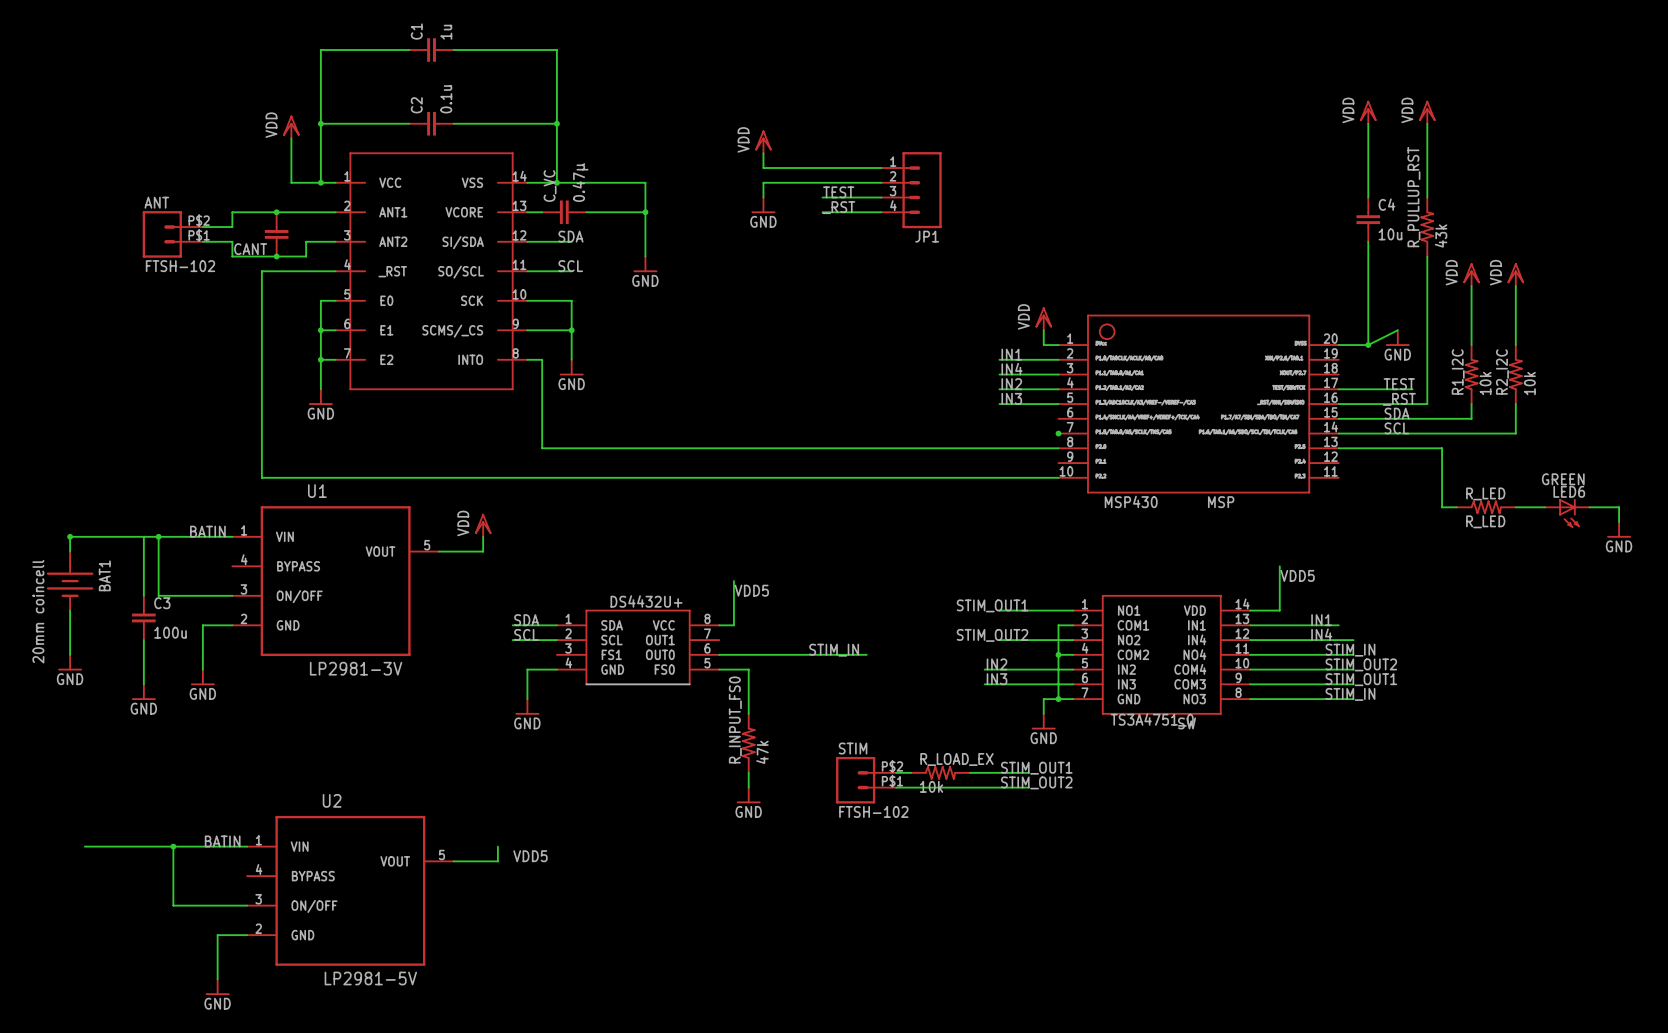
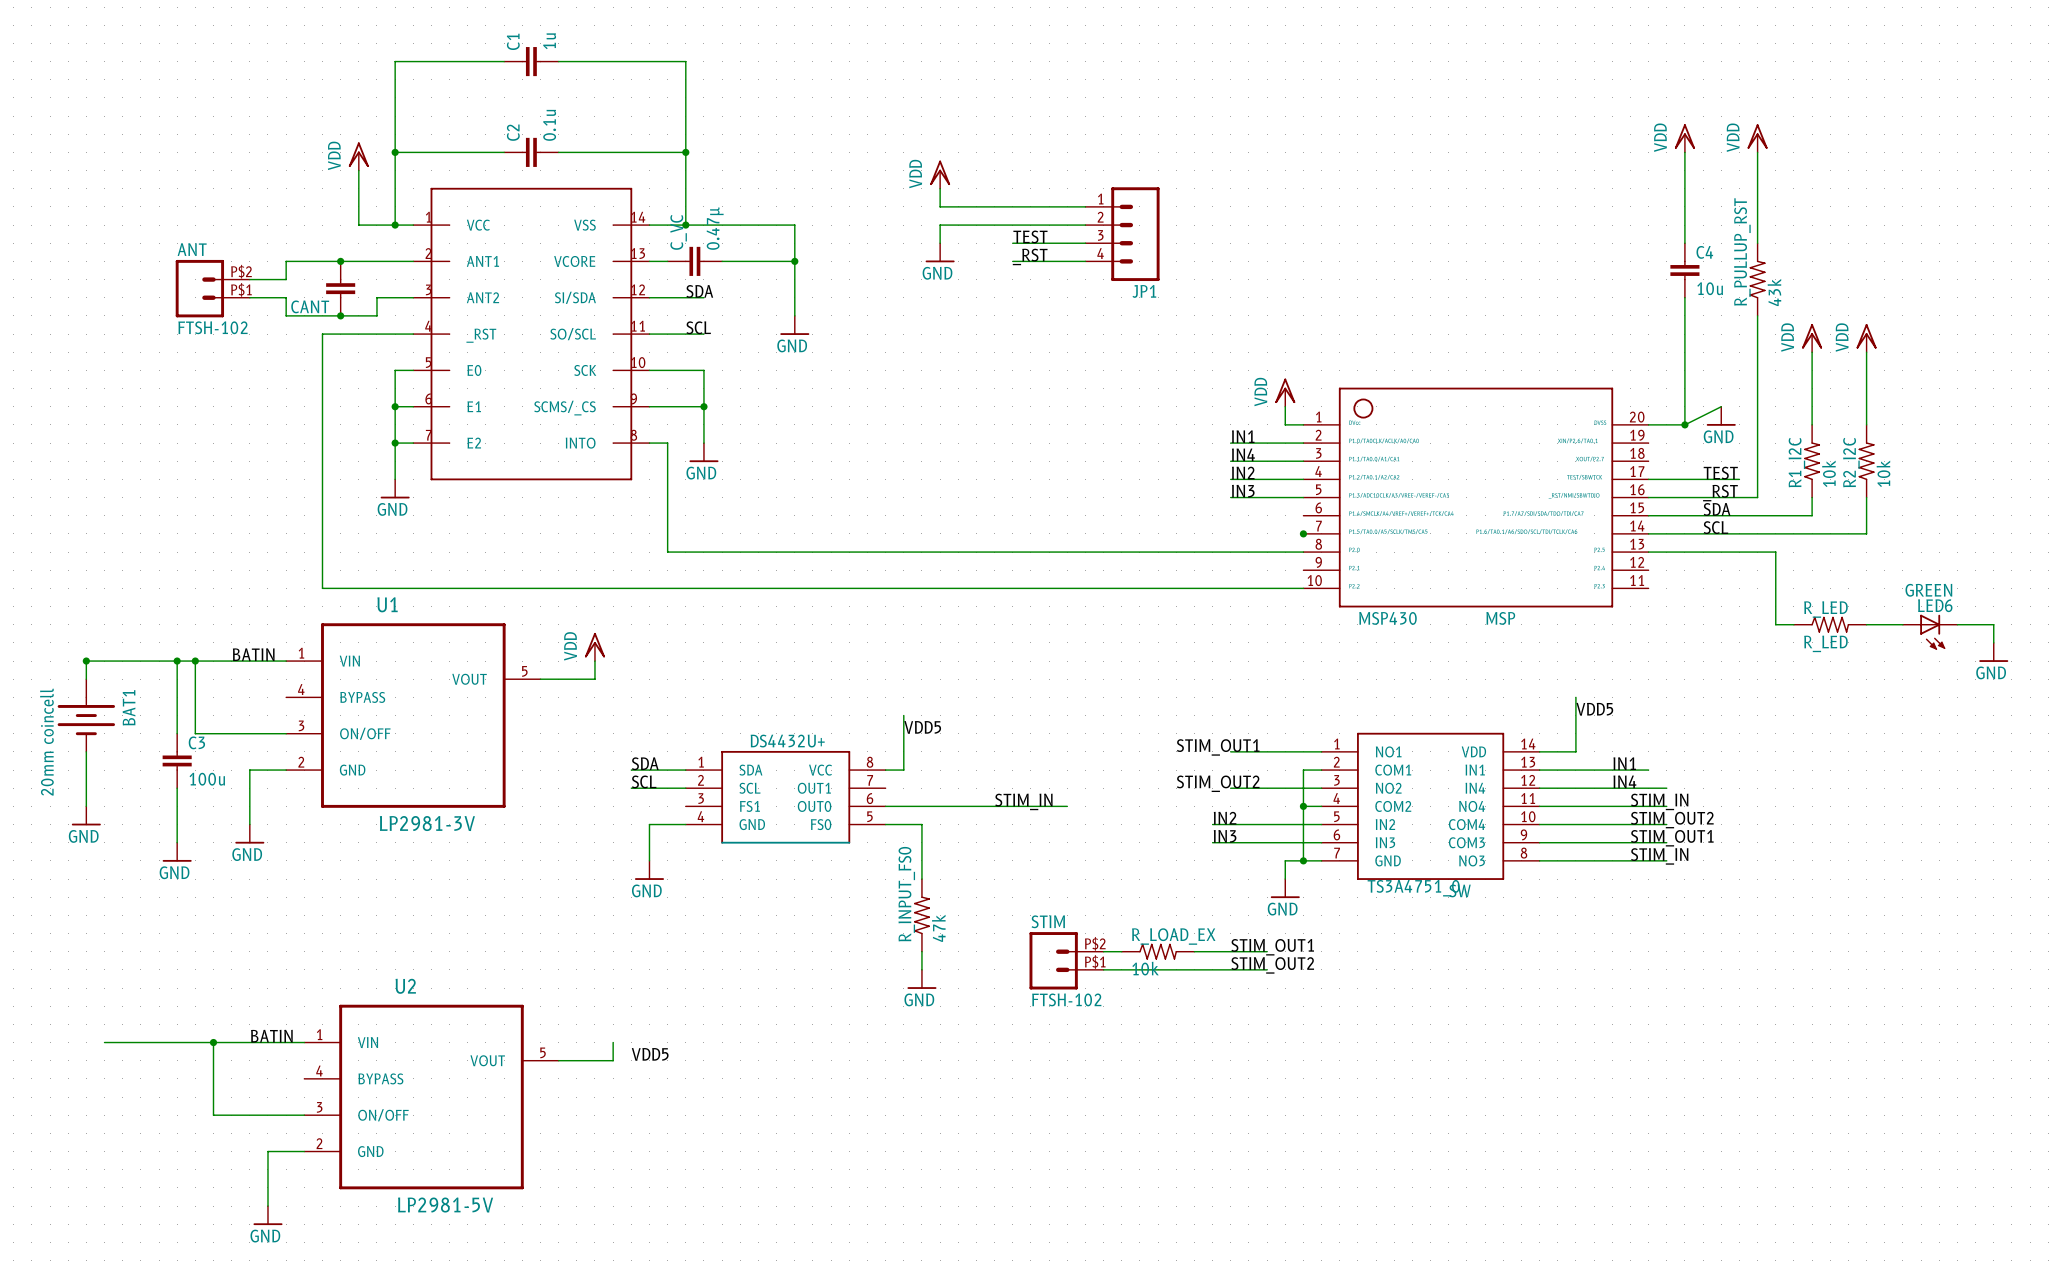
junction: none -> (177, 661)

